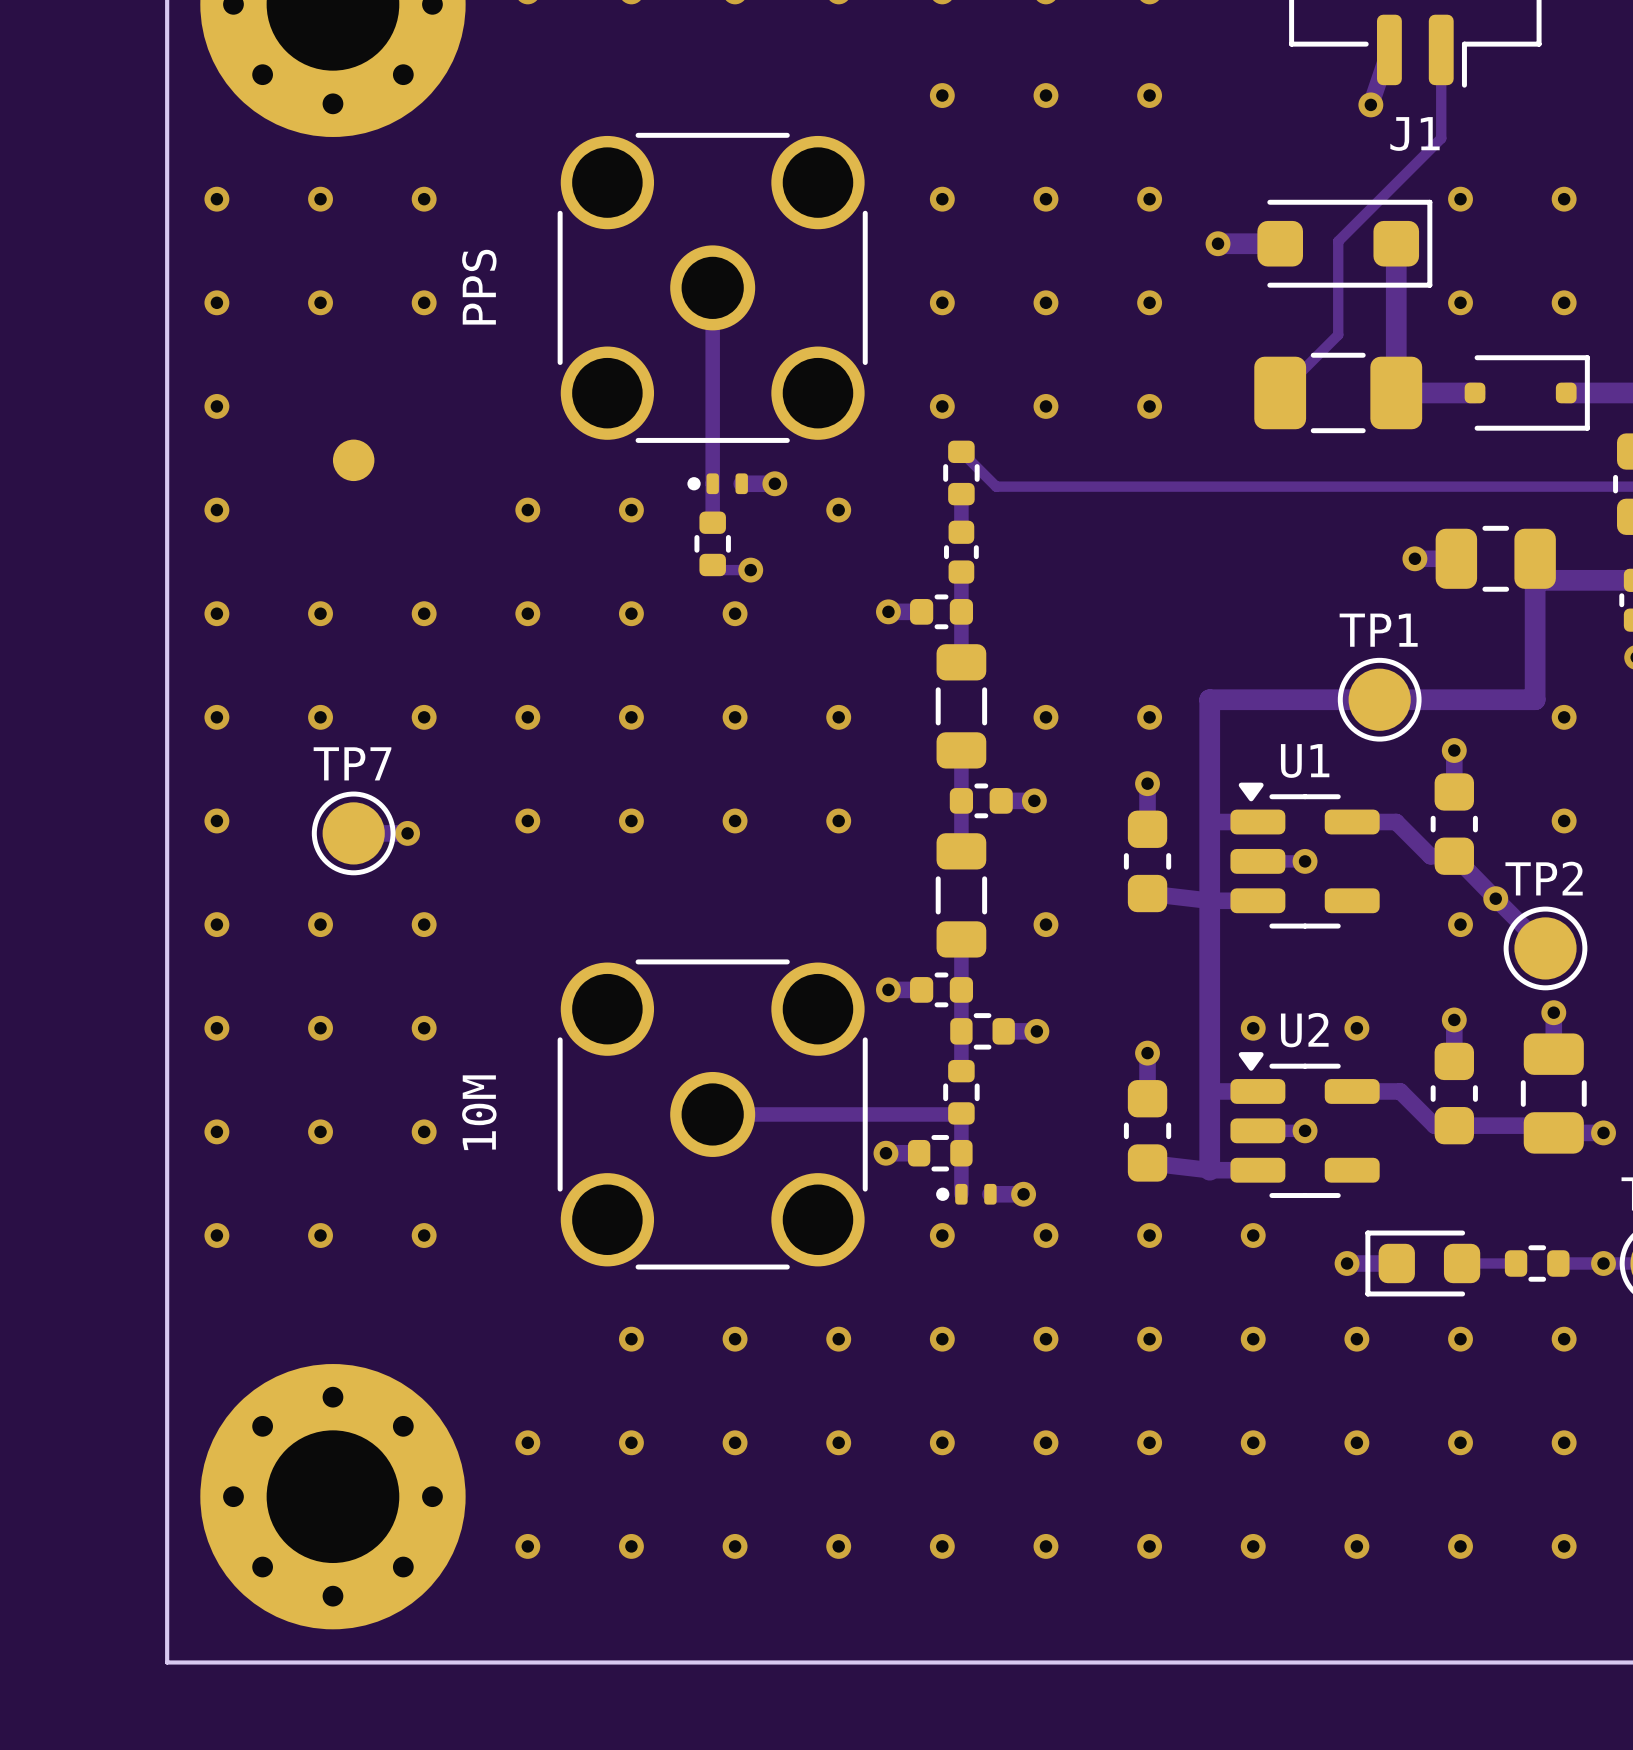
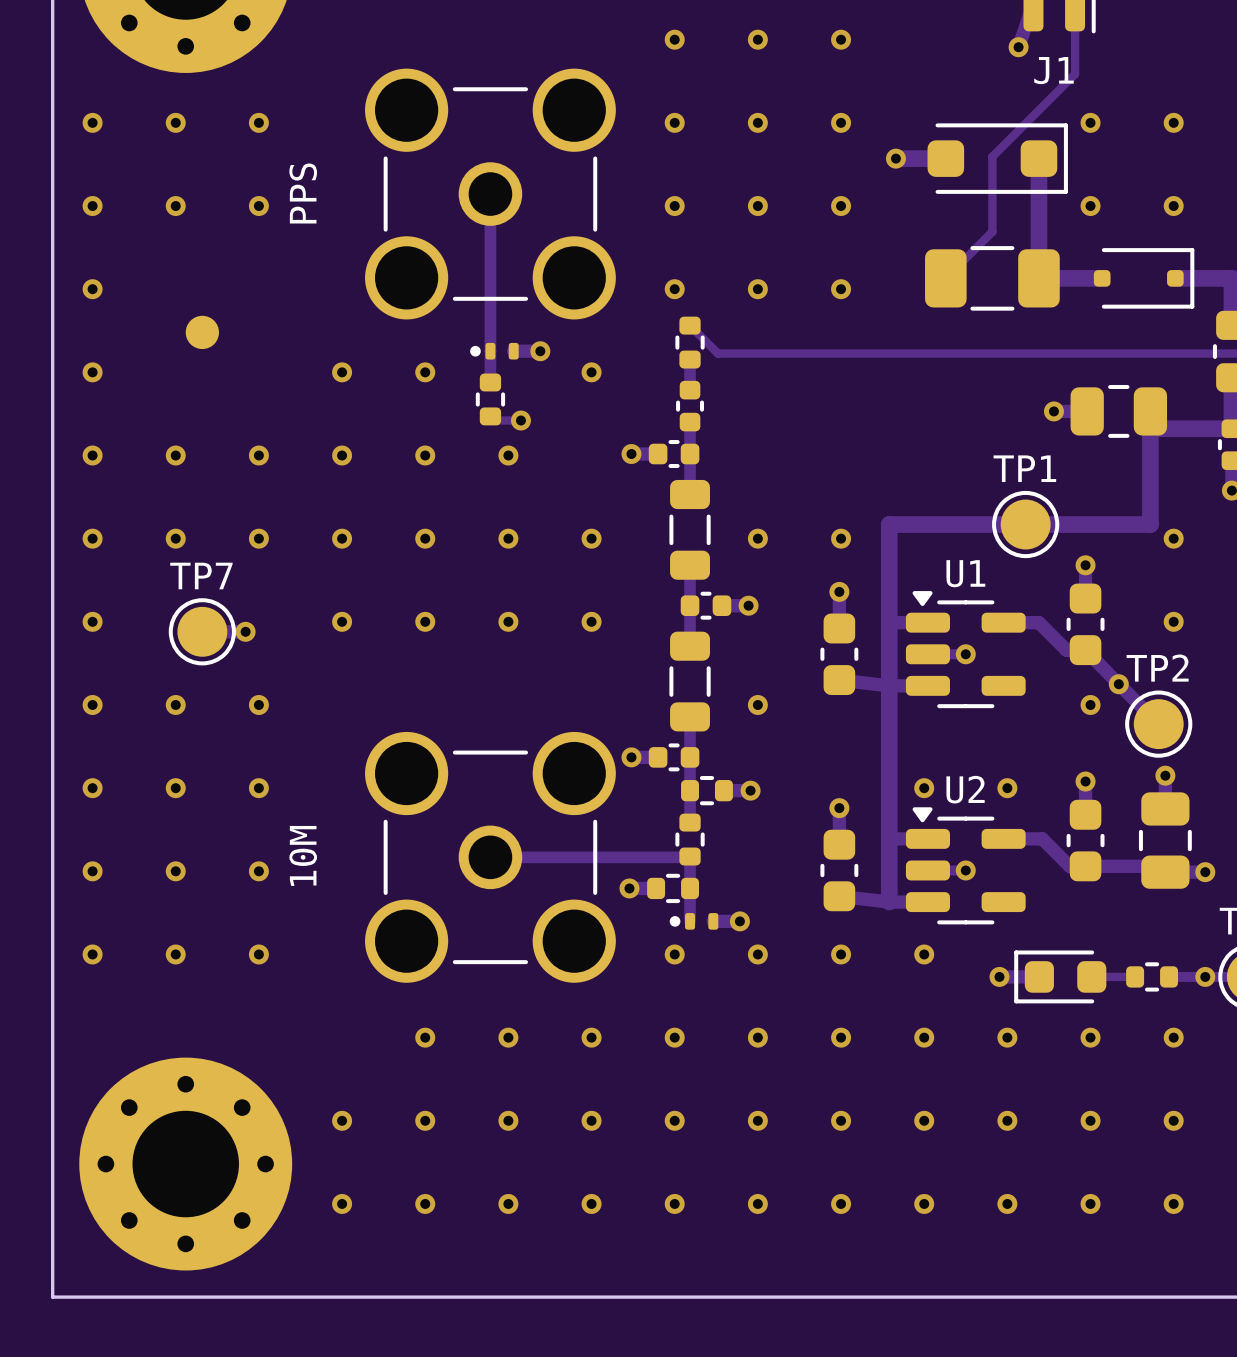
part footprint: [557, 132, 868, 443] -> [365, 68, 616, 320]
part footprint: [557, 959, 868, 1270] -> [365, 731, 616, 983]

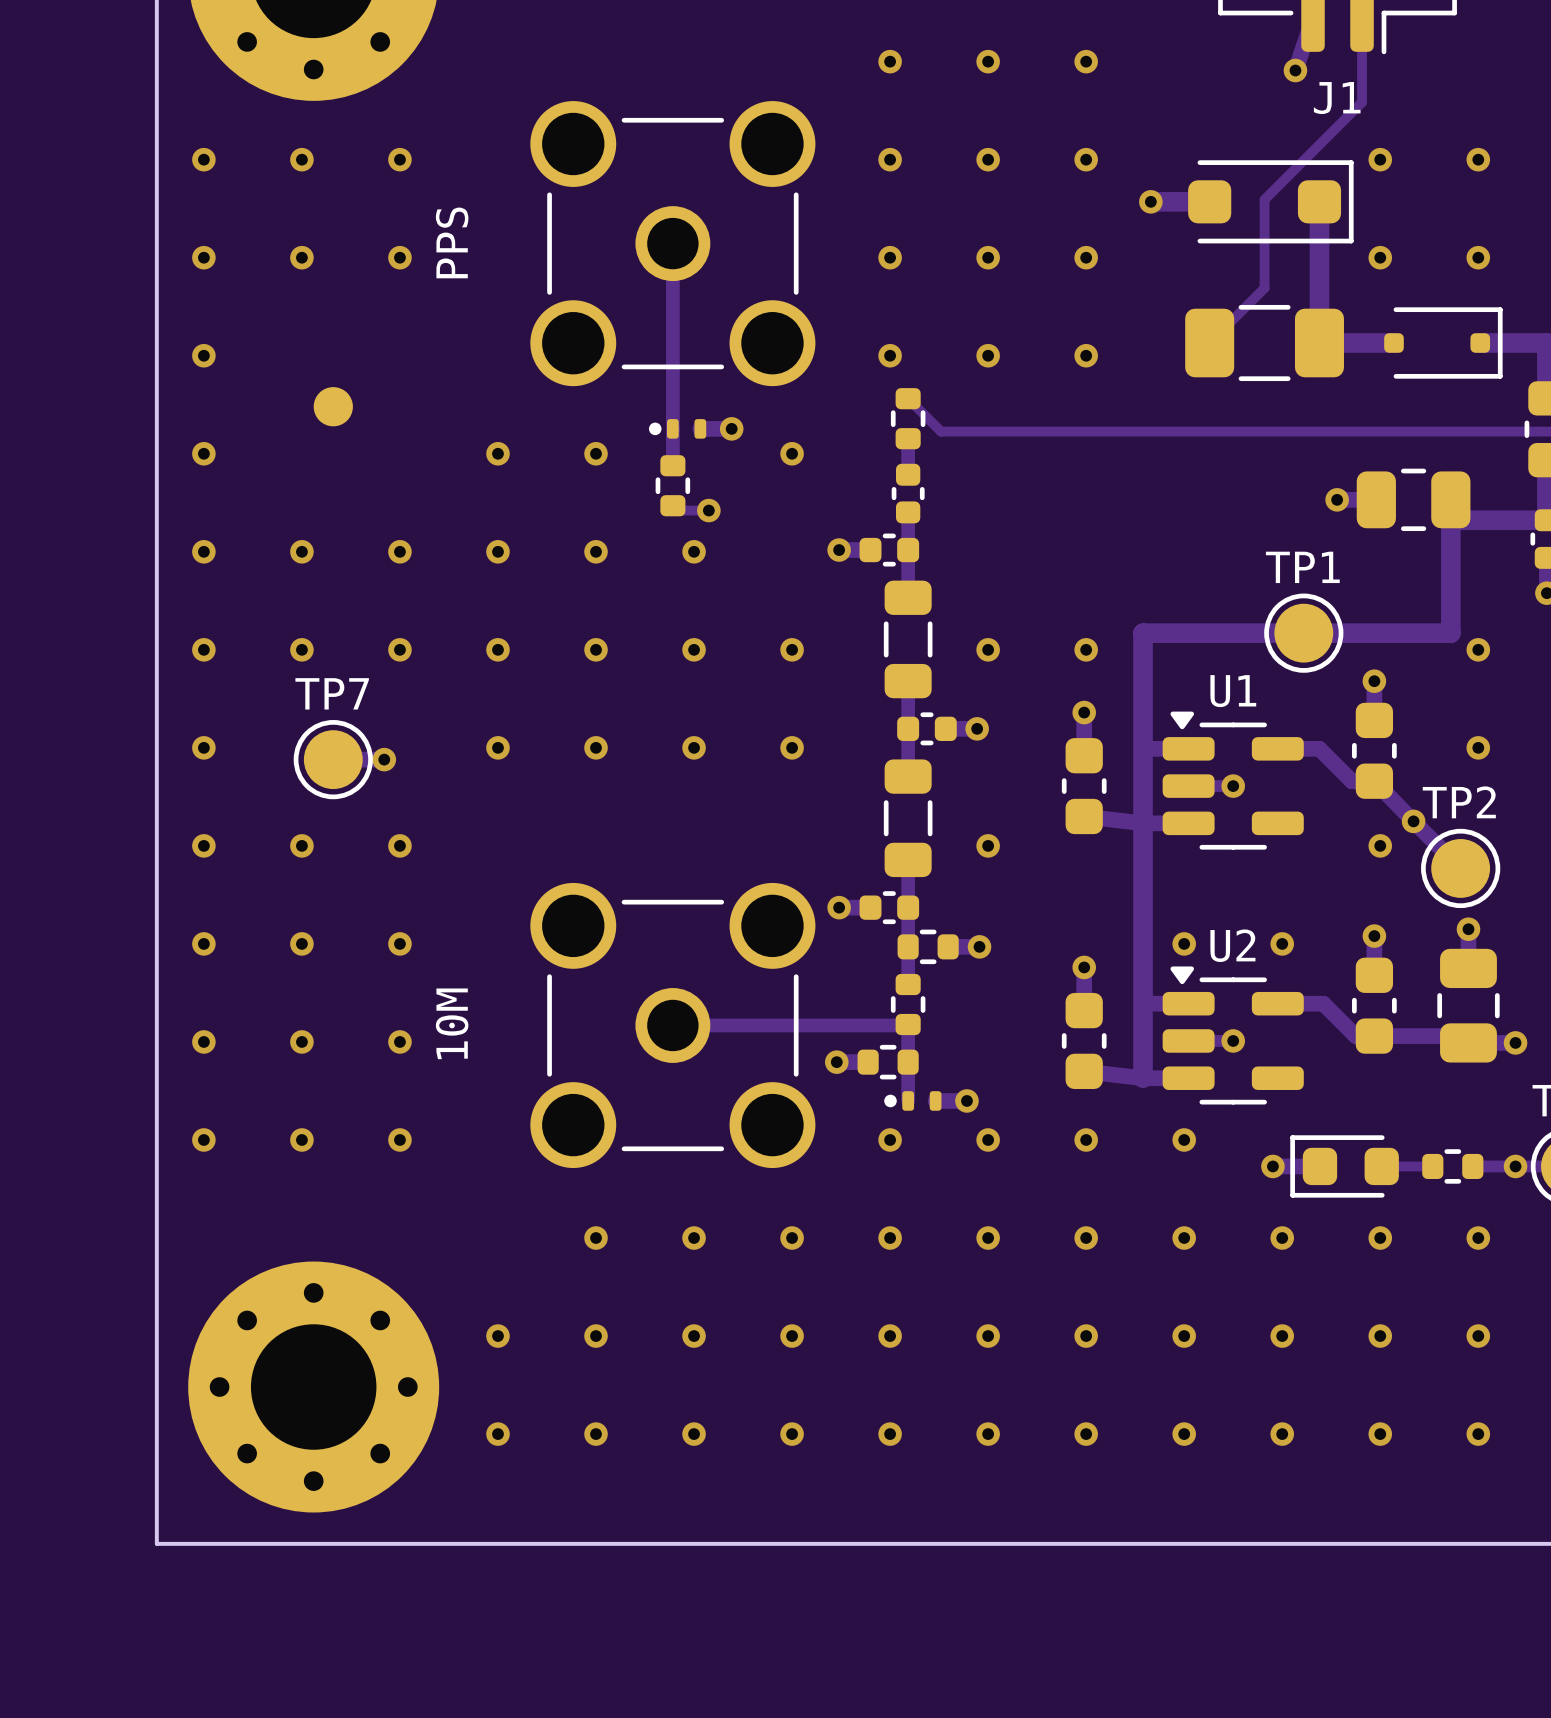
part footprint: [365, 68, 616, 320] -> [530, 101, 816, 387]
part footprint: [365, 731, 616, 983] -> [530, 882, 816, 1169]

